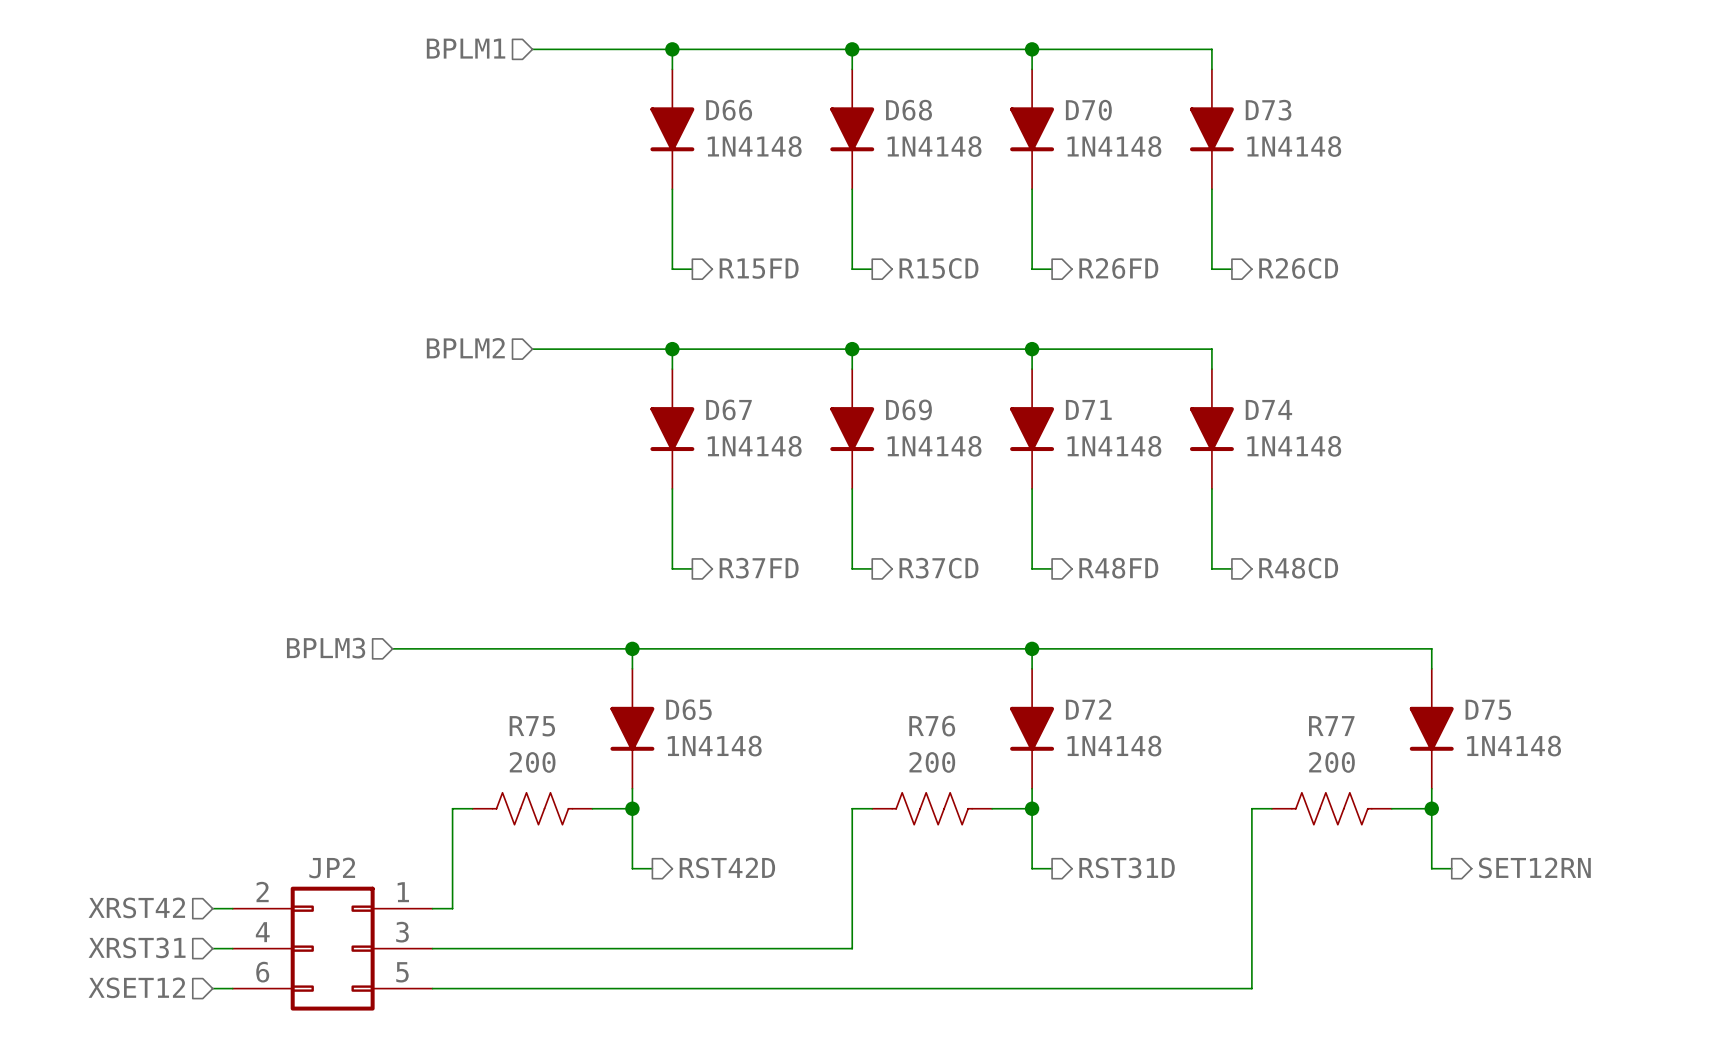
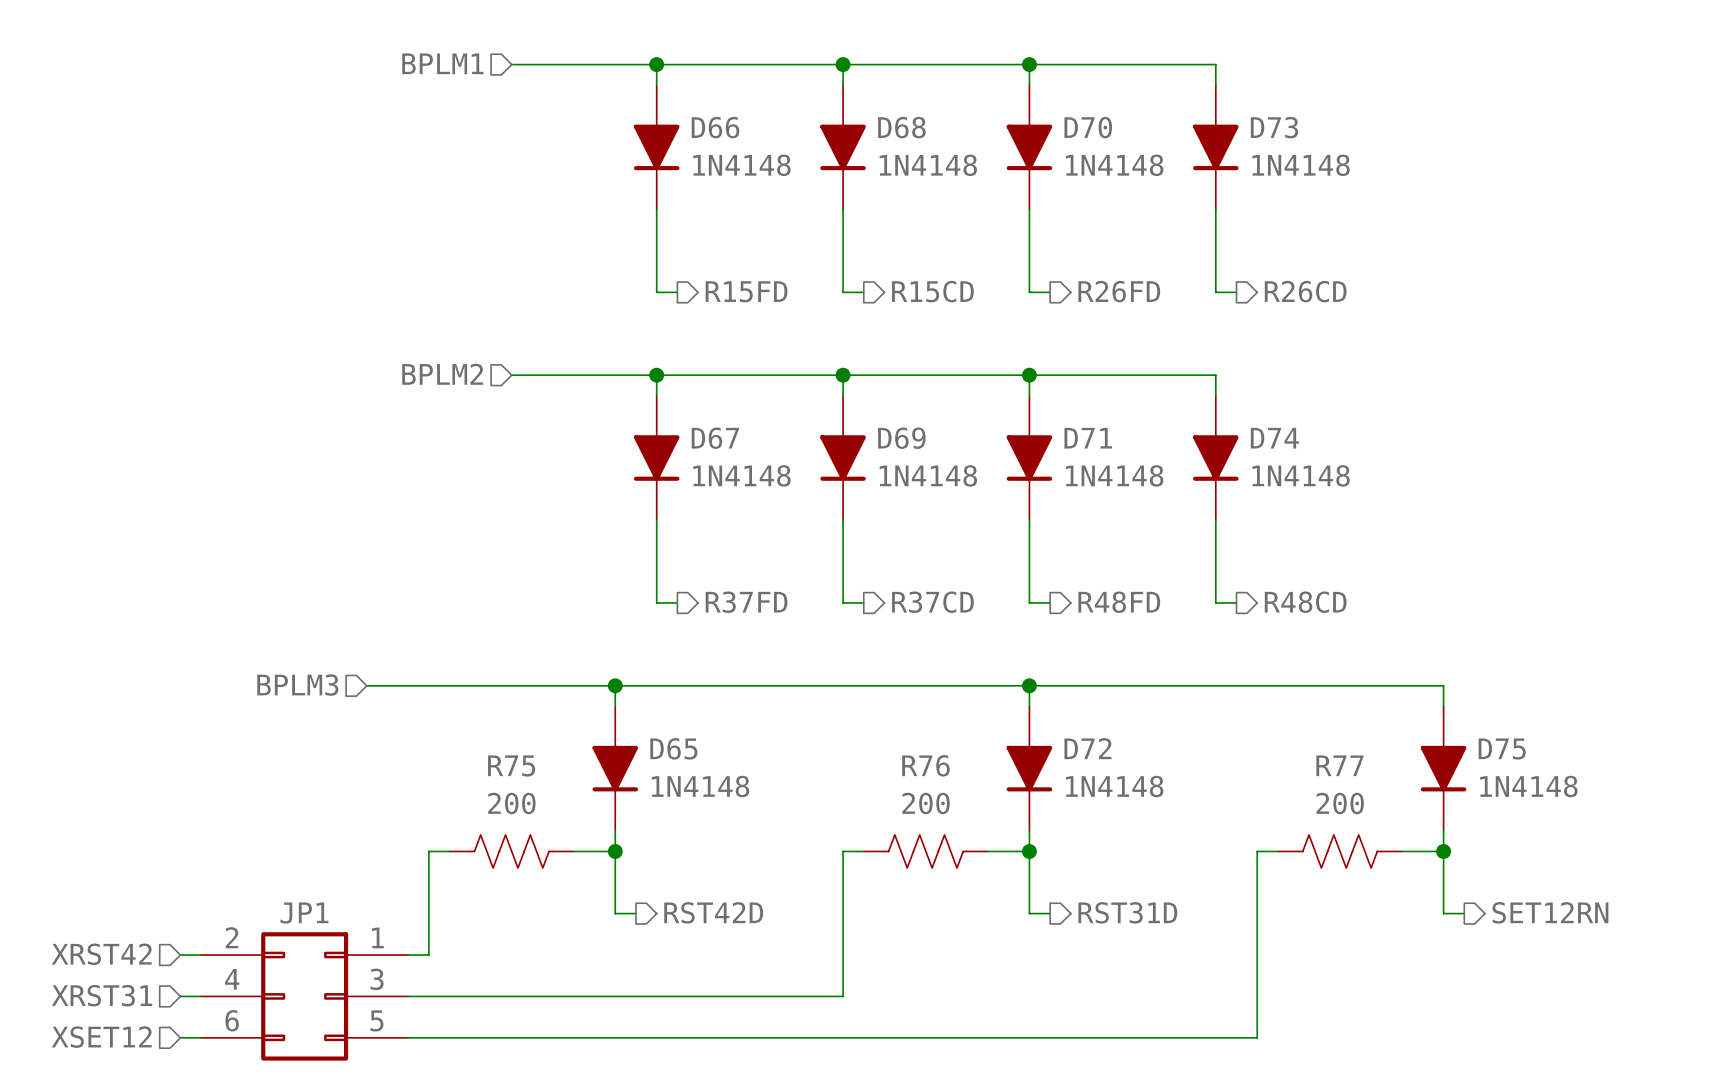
JP2 name: JP2 (332, 867) -> JP1 (304, 913)

